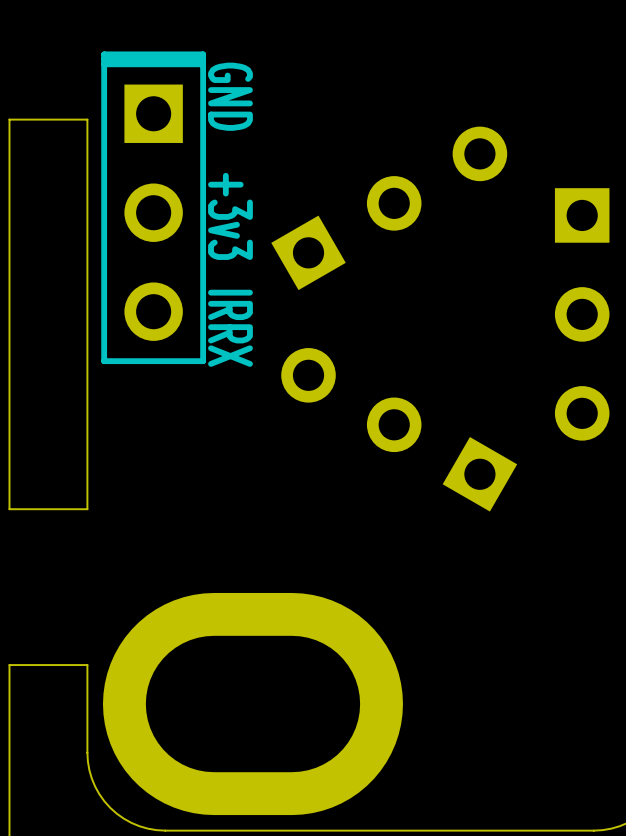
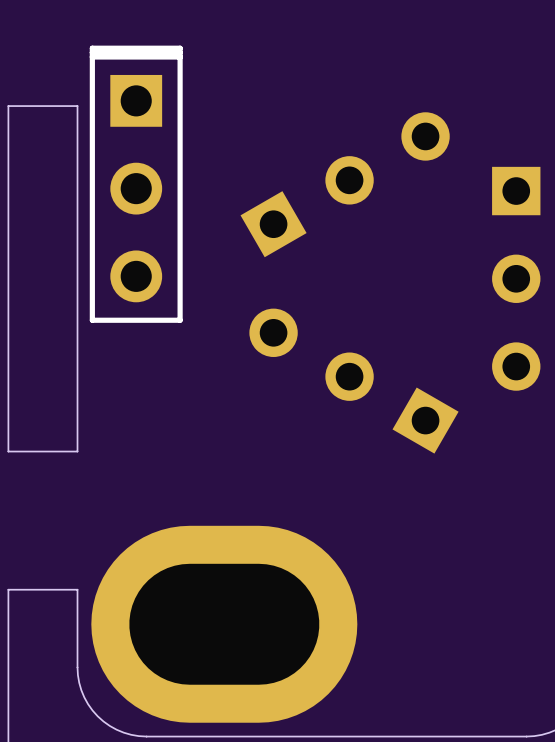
text: GND (230, 96) -> none
text: +3v3 (230, 216) -> none
text: IRRX (230, 328) -> none

